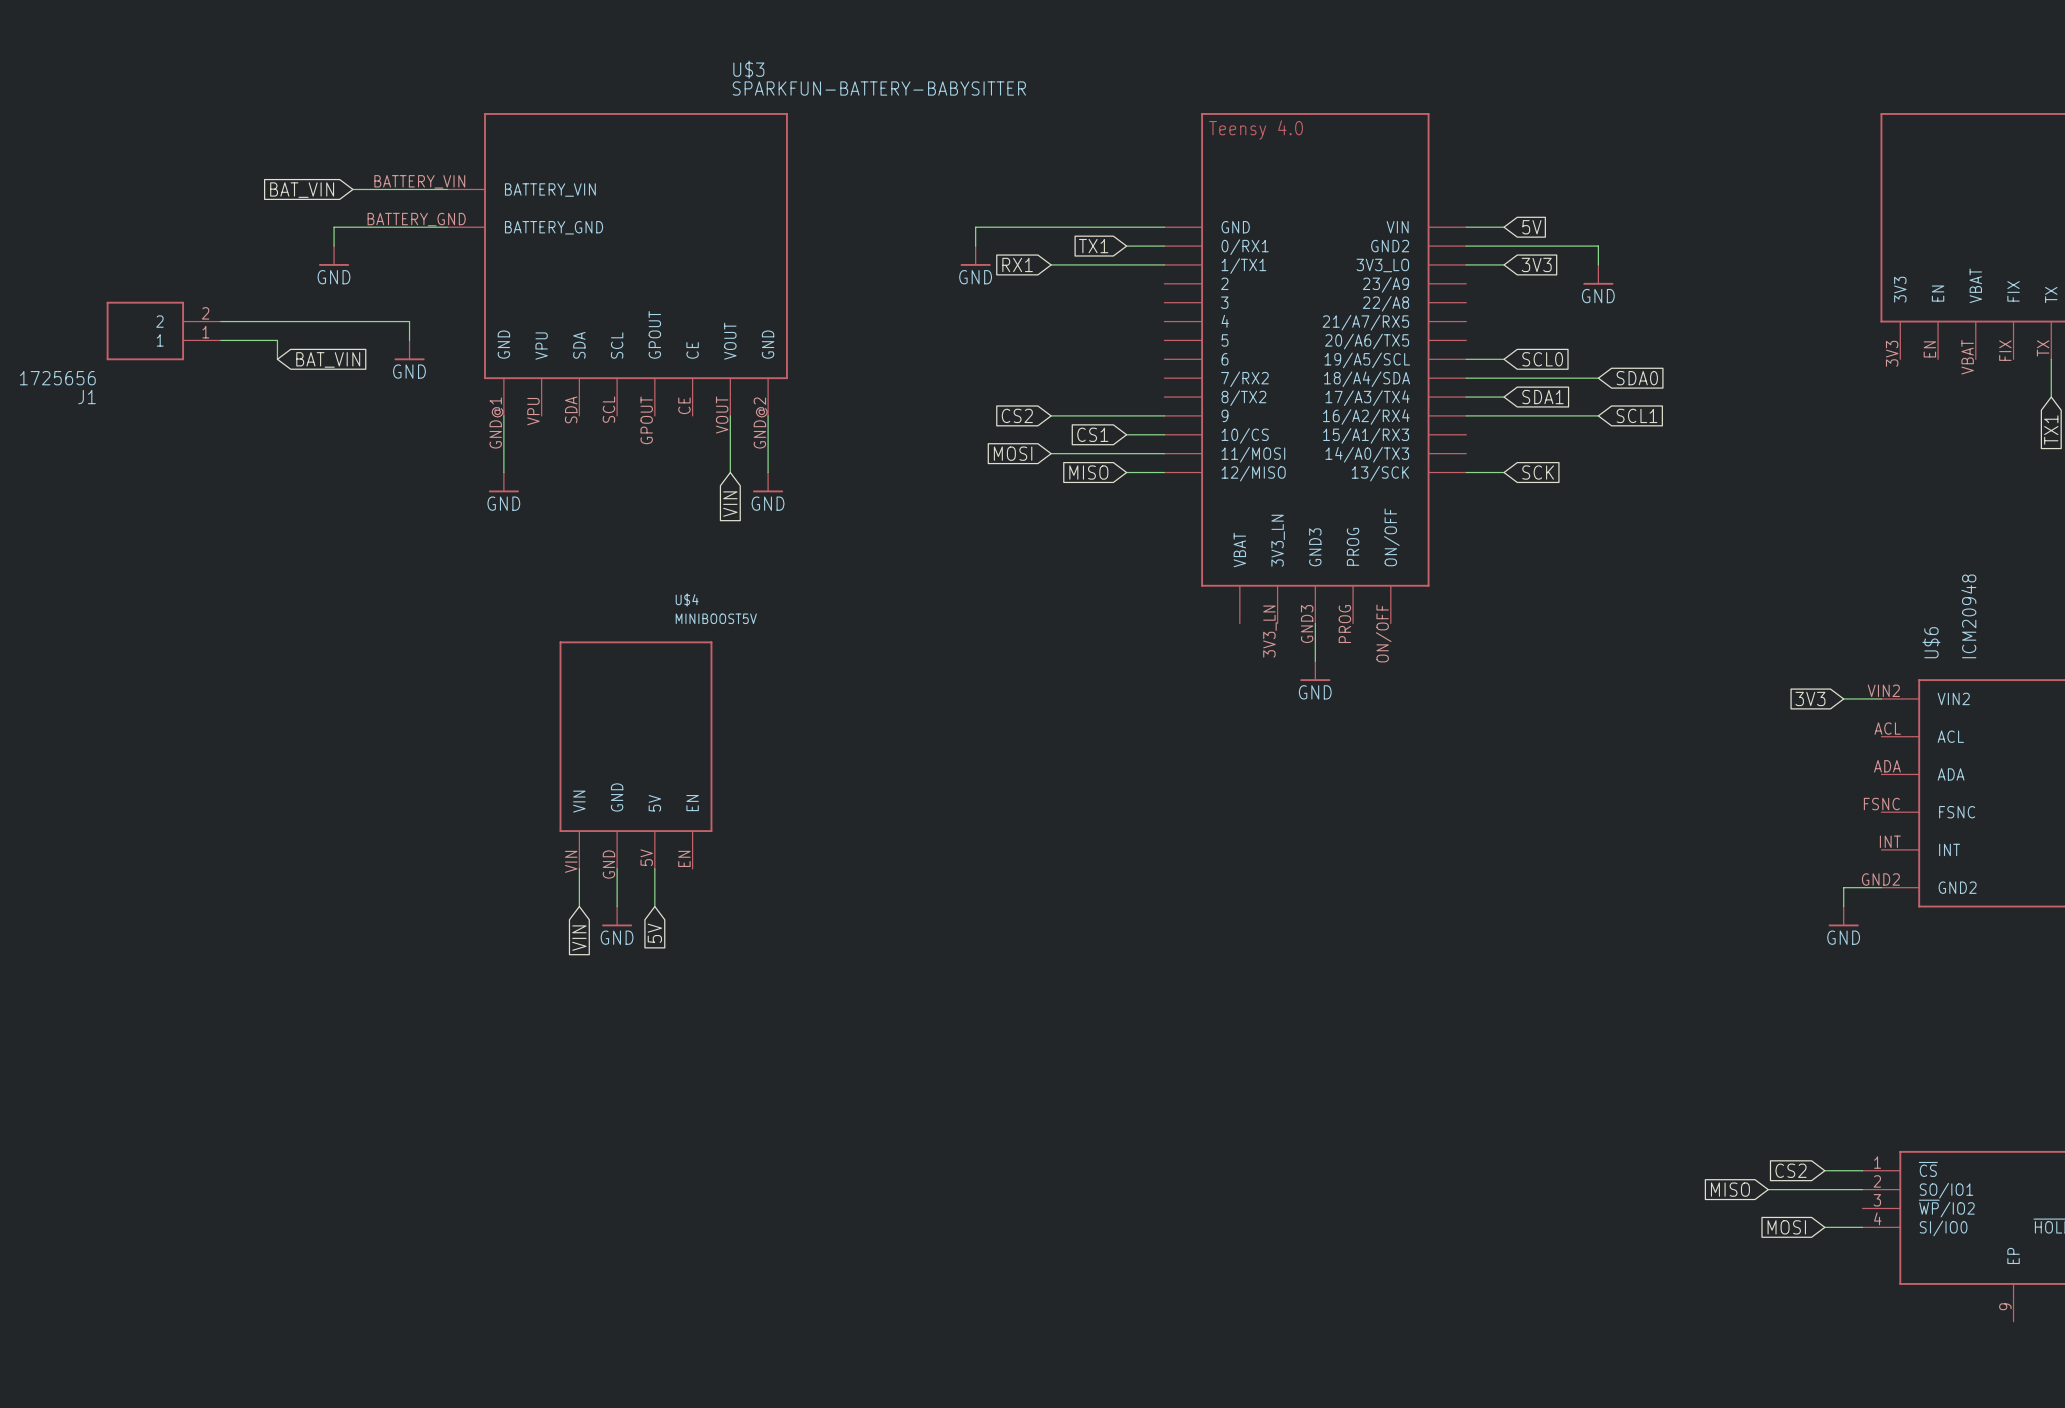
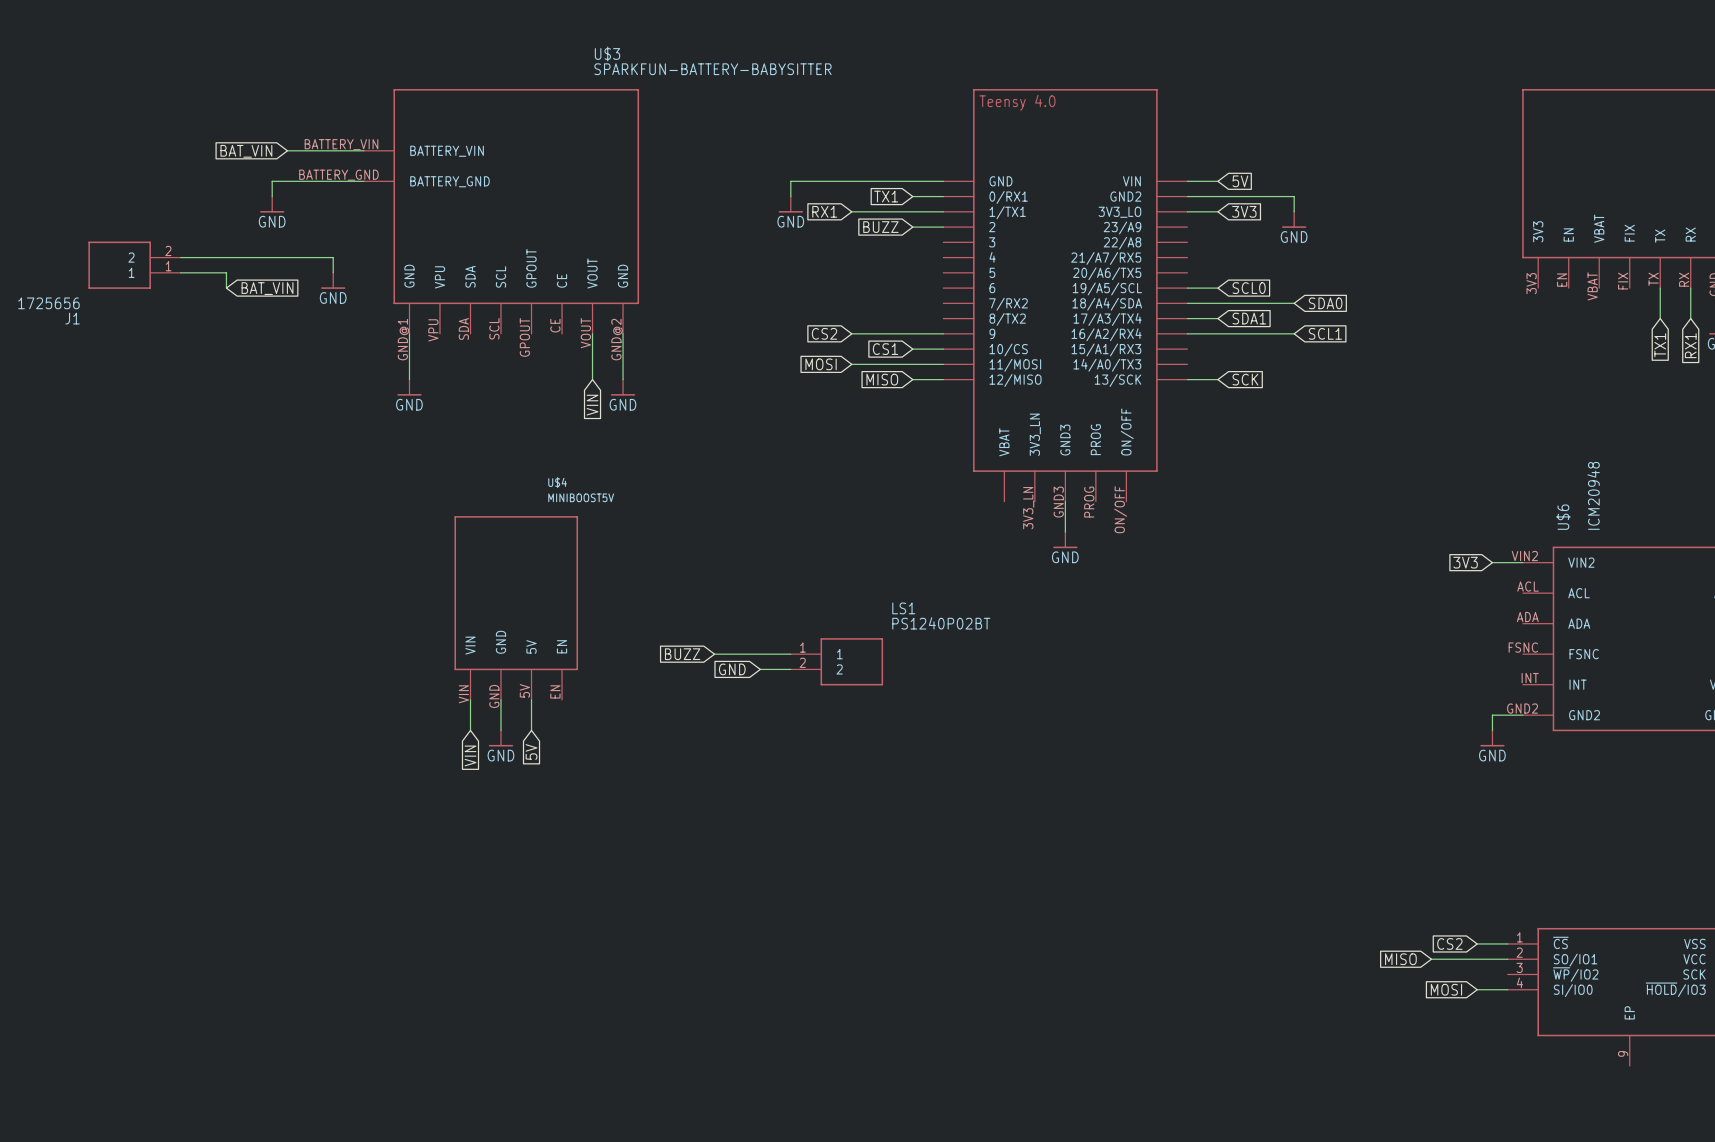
global label: none -> BUZZ (880, 227)
wire: none -> (912, 227) (943, 227)
global label: none -> BUZZ (682, 654)
wire: none -> (714, 654) (790, 654)
LS1: none -> PS1240P02BT (836, 661)
global label: none -> GND (732, 669)
wire: none -> (760, 669) (790, 669)

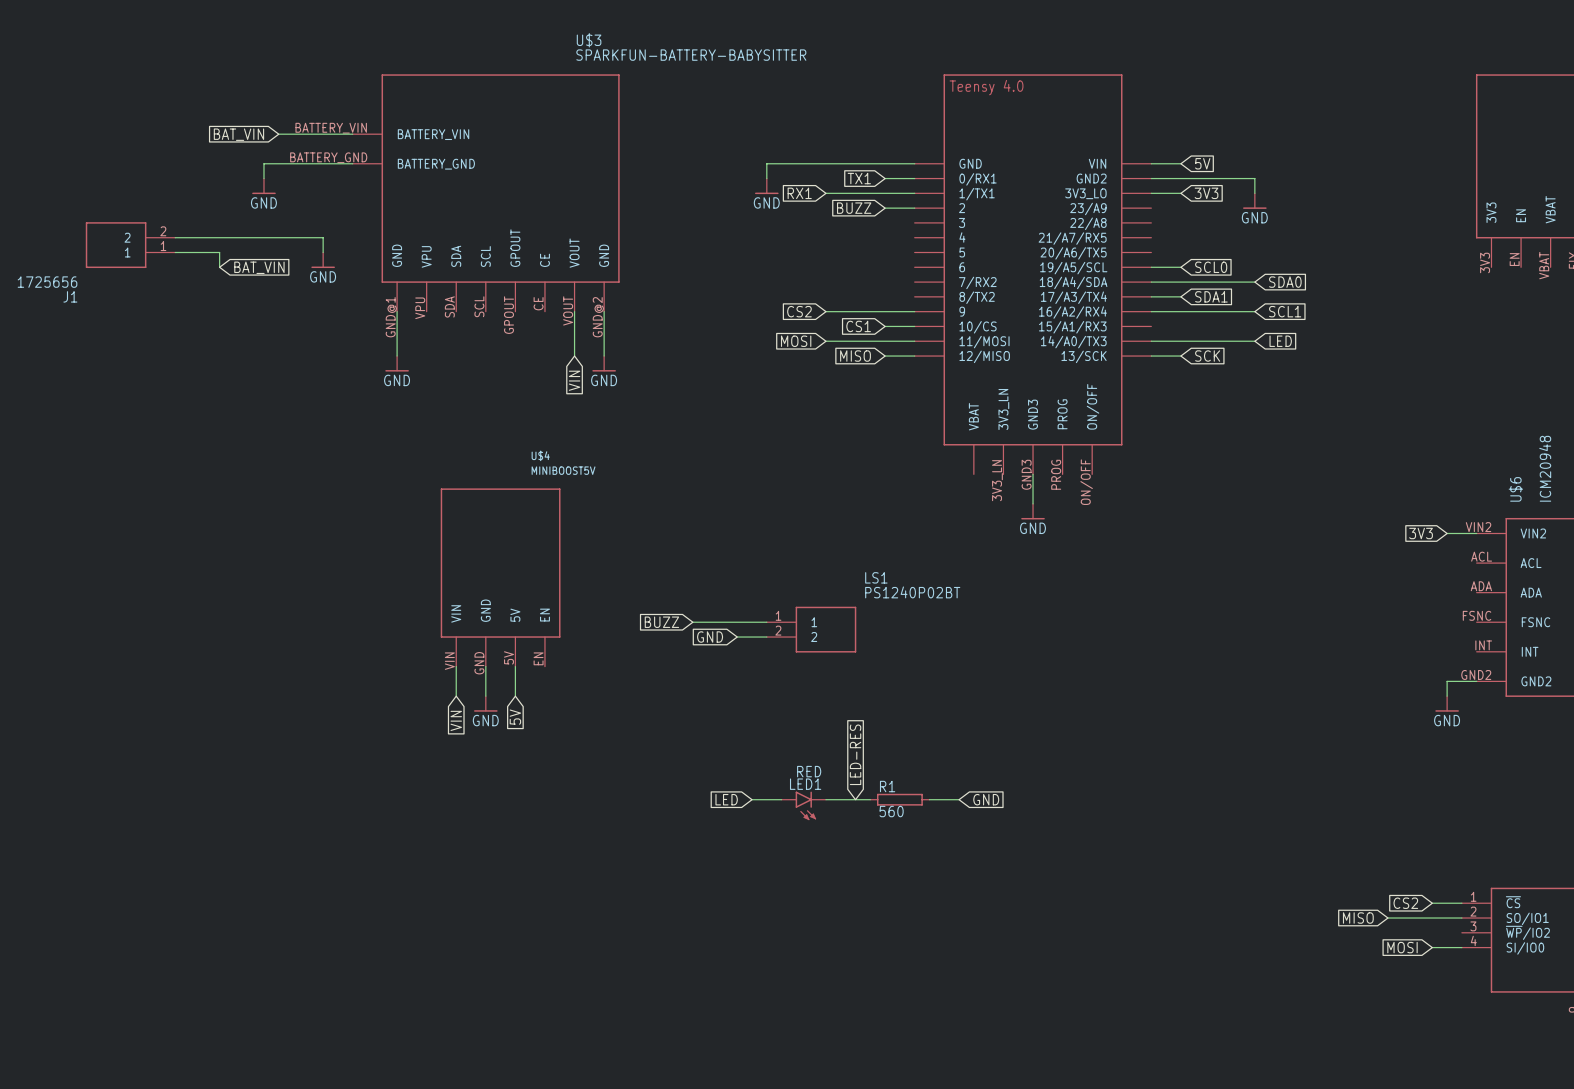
wire: none -> (1151, 341) (1254, 341)
global label: none -> LED (1280, 341)
global label: none -> LED-RES (855, 754)
global label: none -> LED (726, 799)
wire: none -> (752, 799) (781, 799)
wire: none -> (825, 799) (870, 799)
R1: none -> 560 (899, 799)
wire: none -> (929, 799) (959, 799)
global label: none -> GND (986, 799)
LED1: none -> RED (803, 805)

